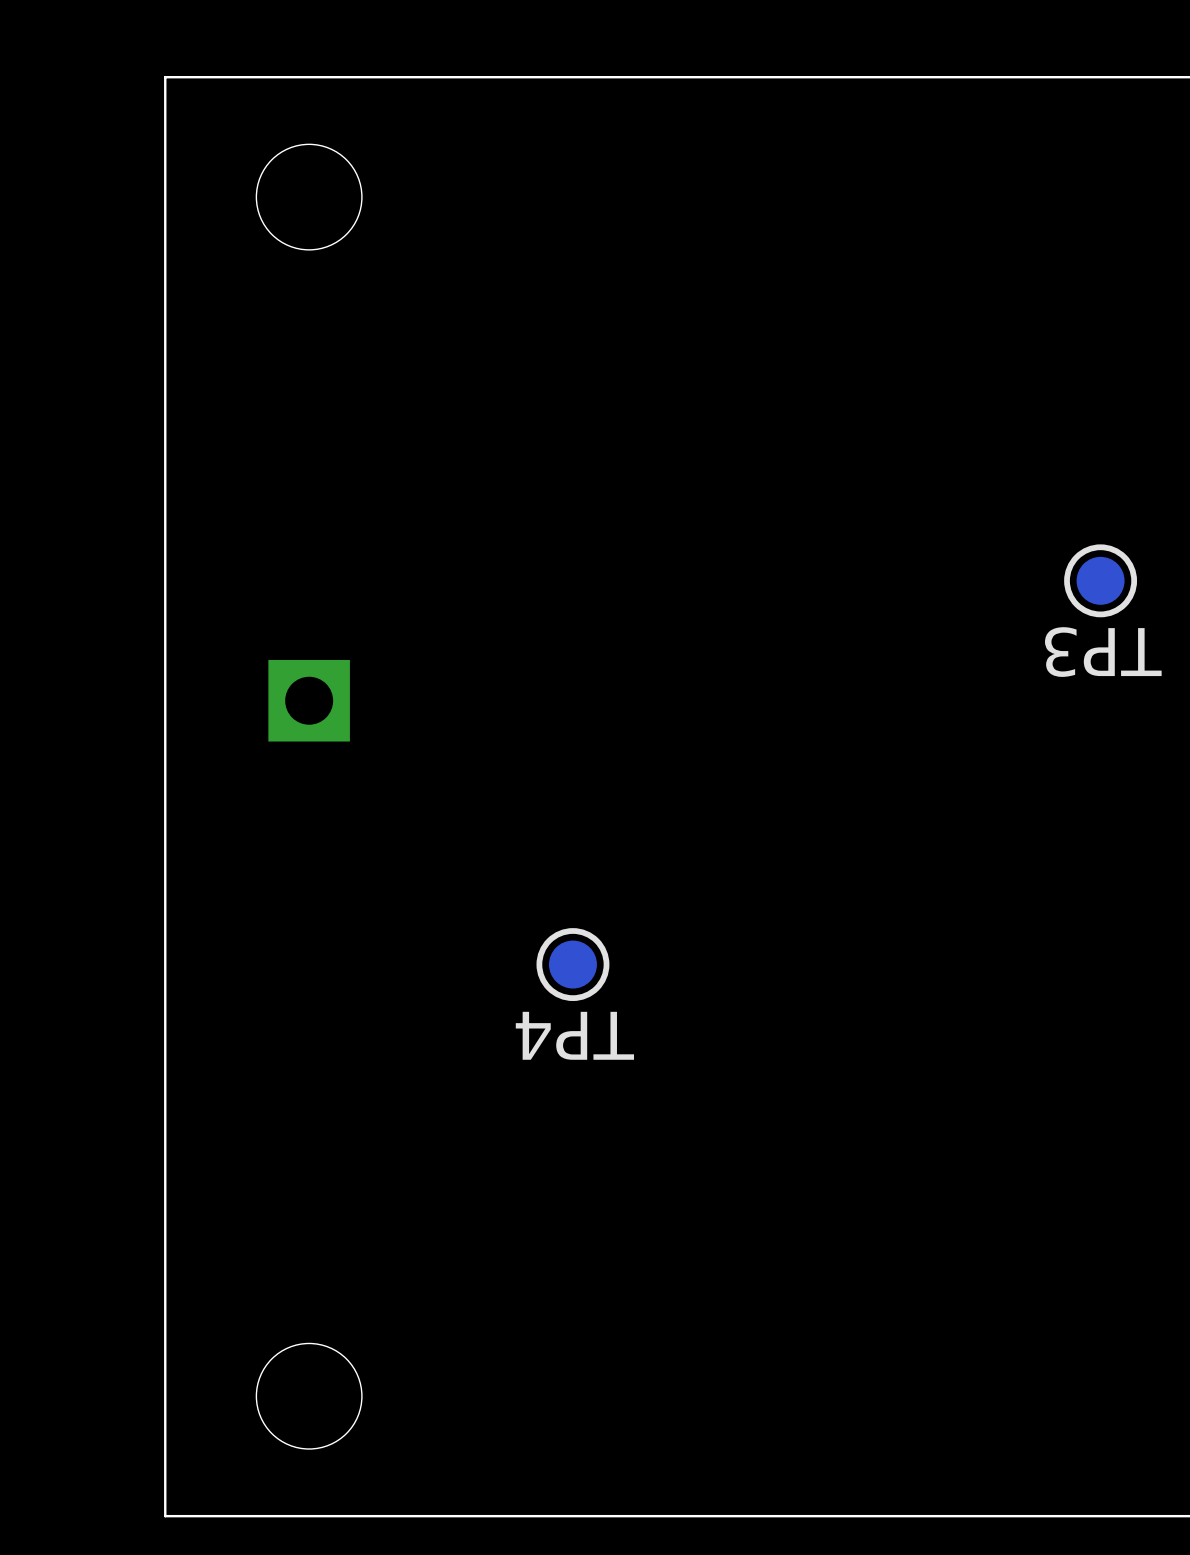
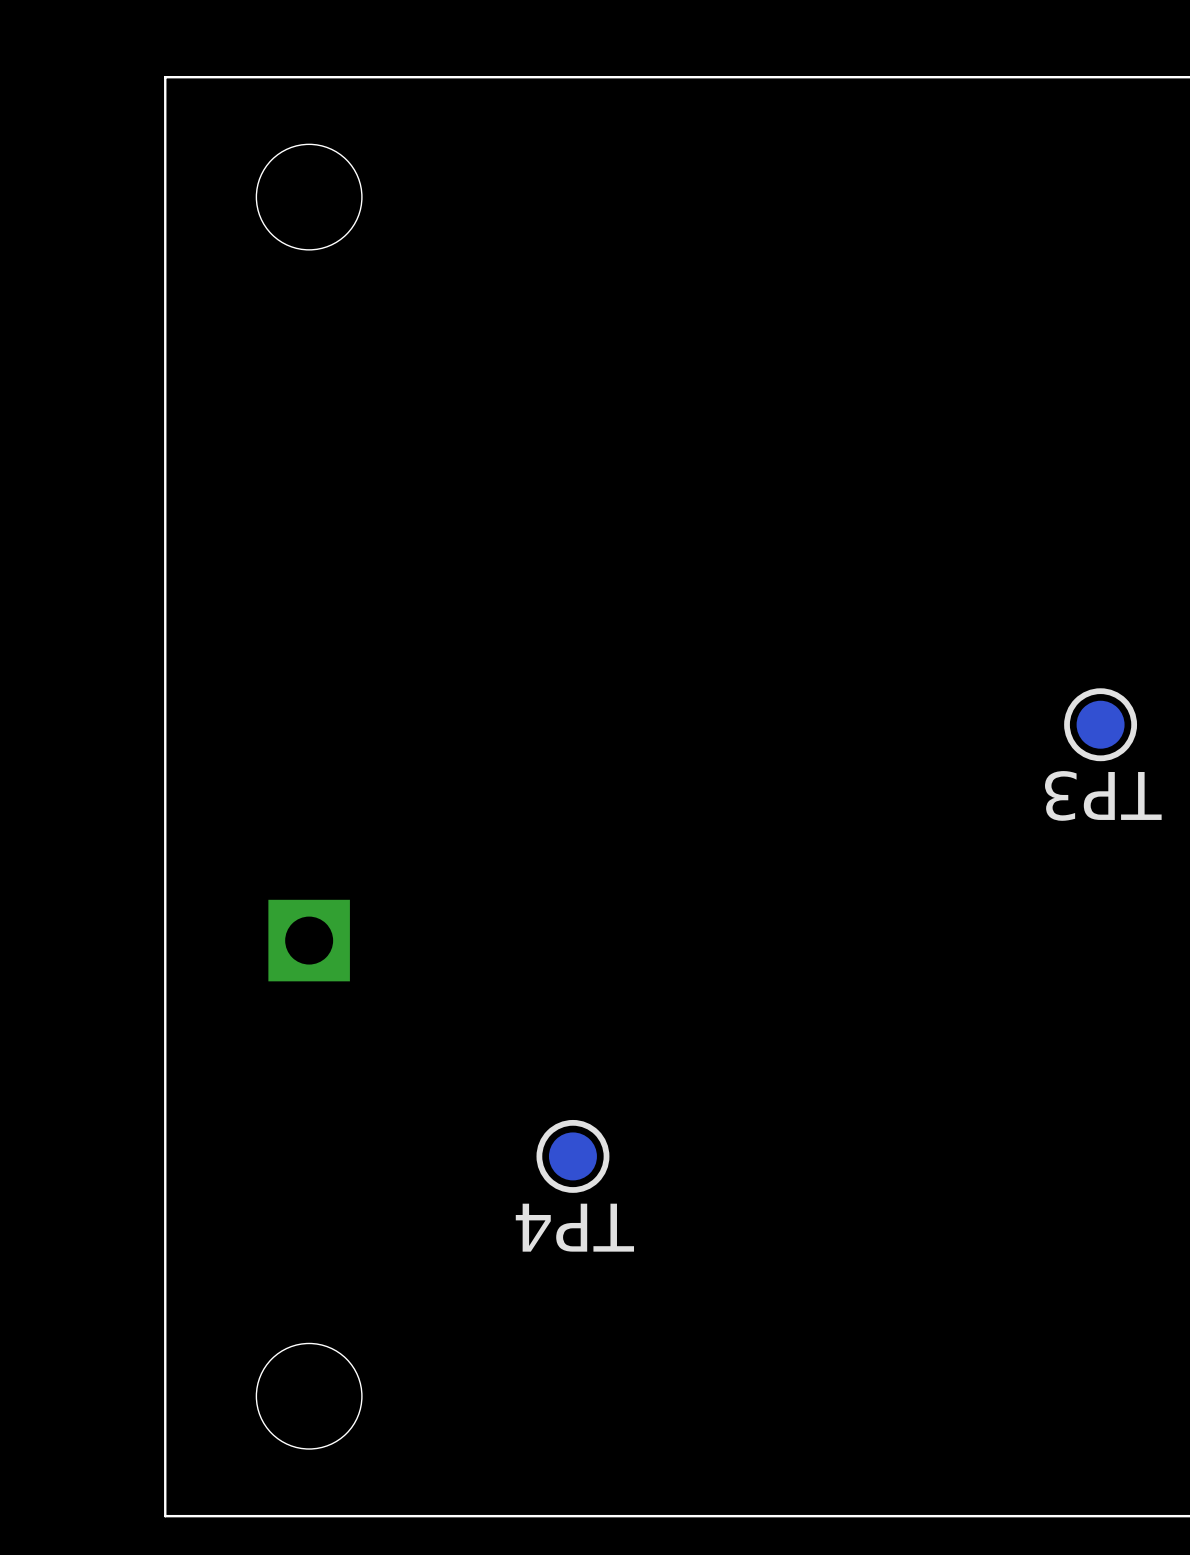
TP3 position: (1100, 580) -> (1100, 724)
part position: (309, 700) -> (309, 940)
TP4 position: (572, 964) -> (572, 1156)

